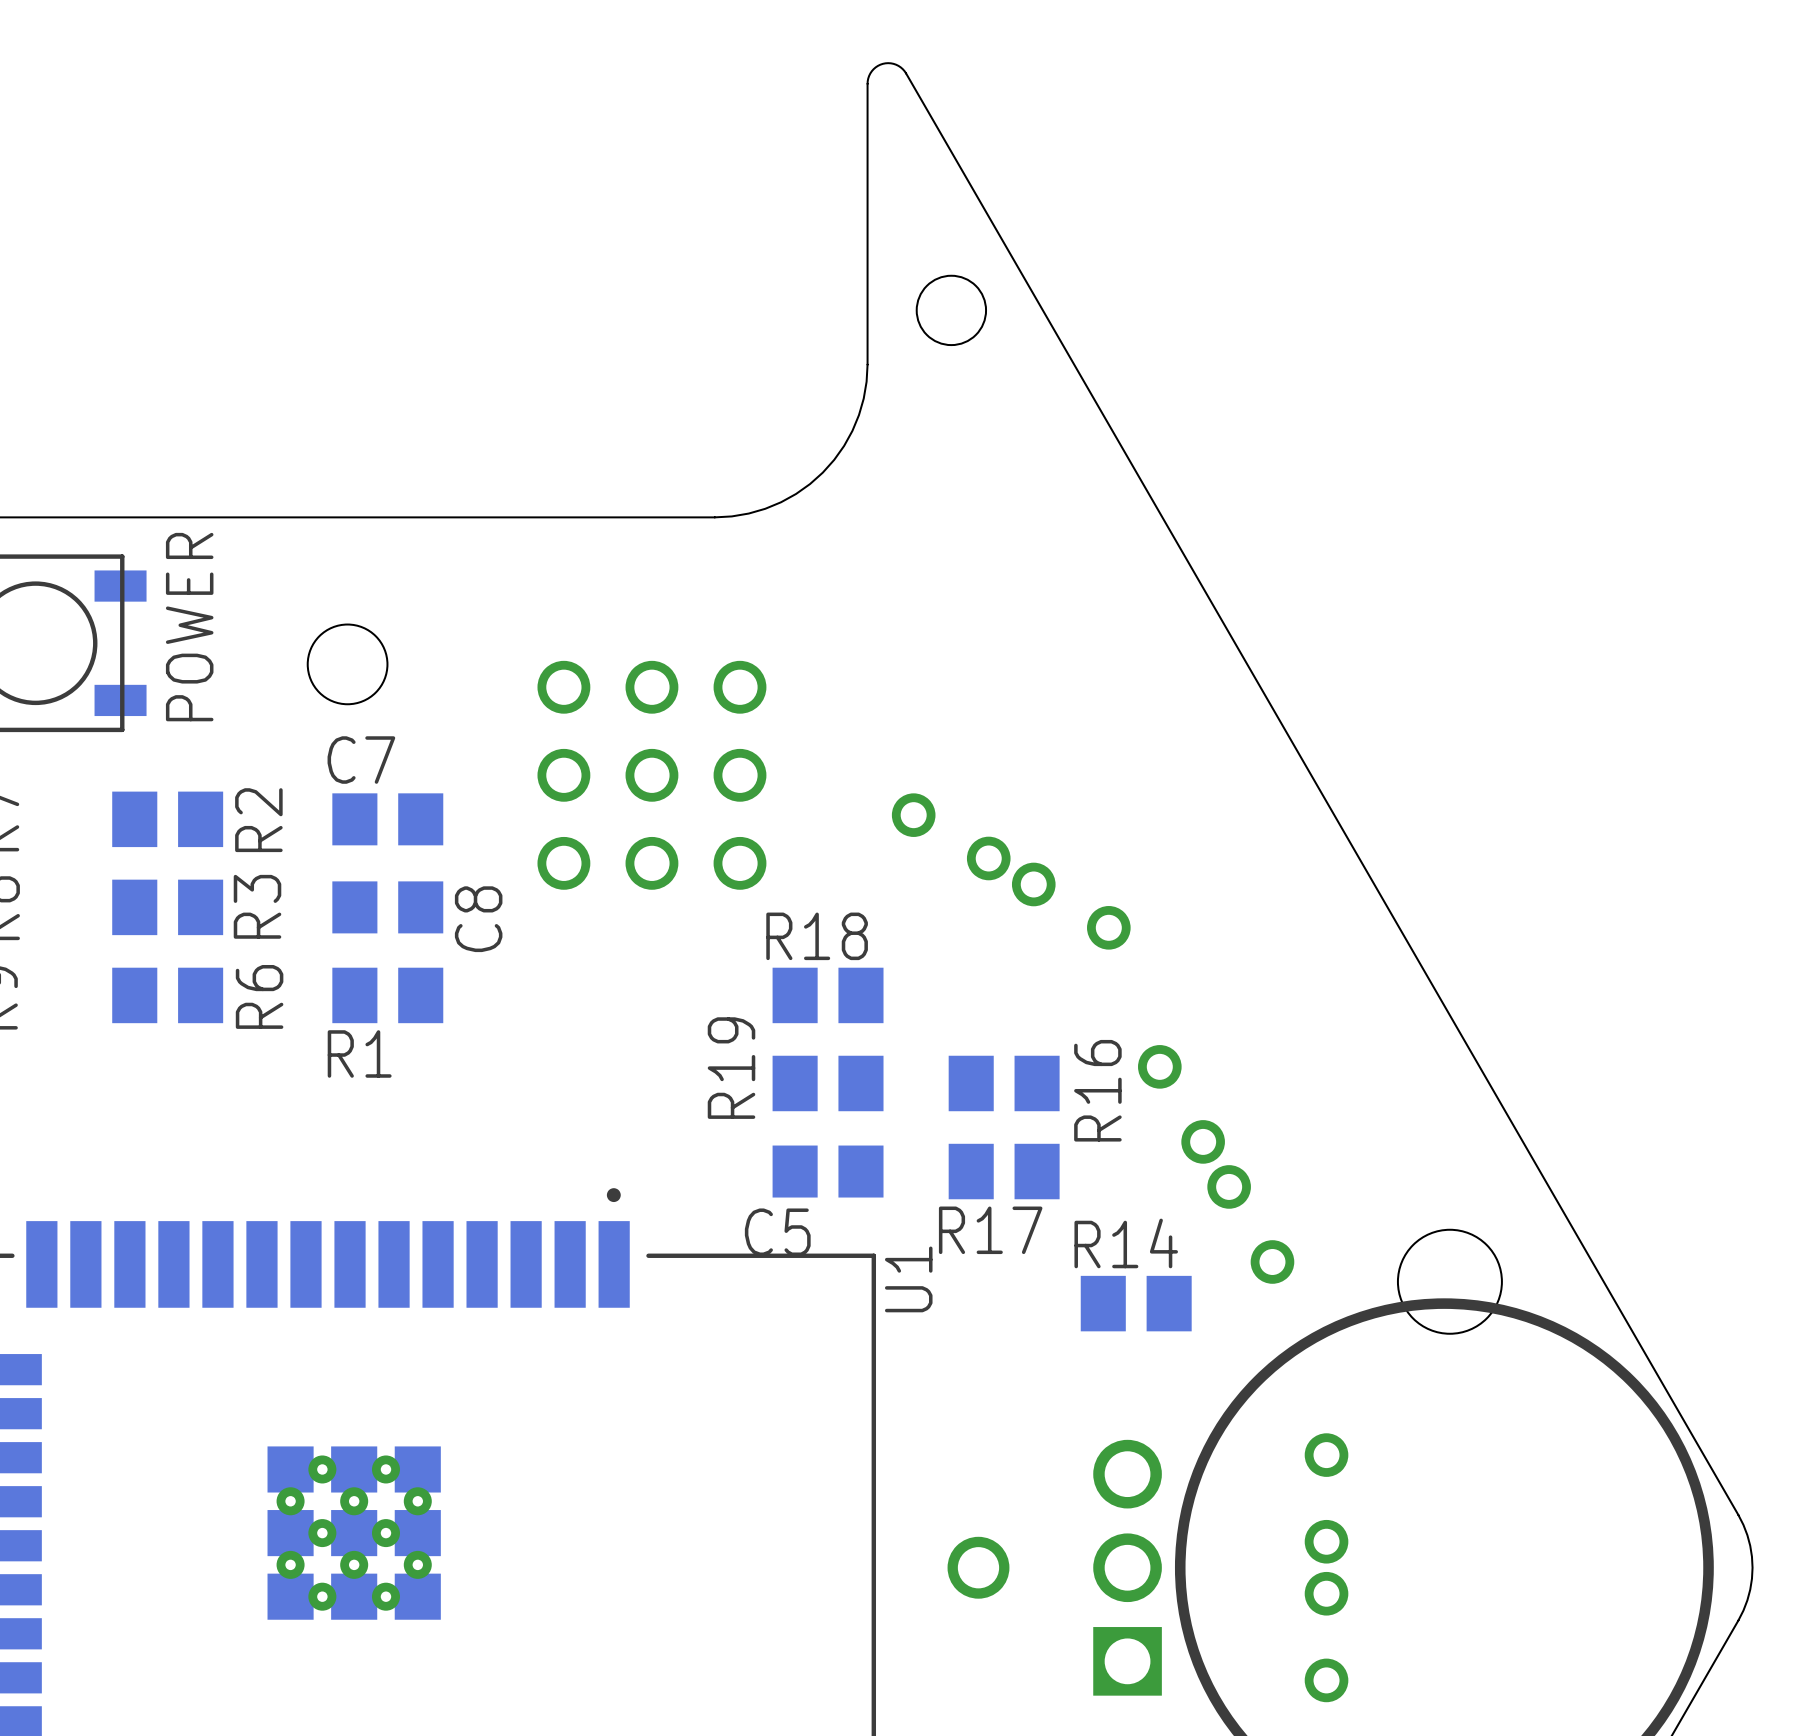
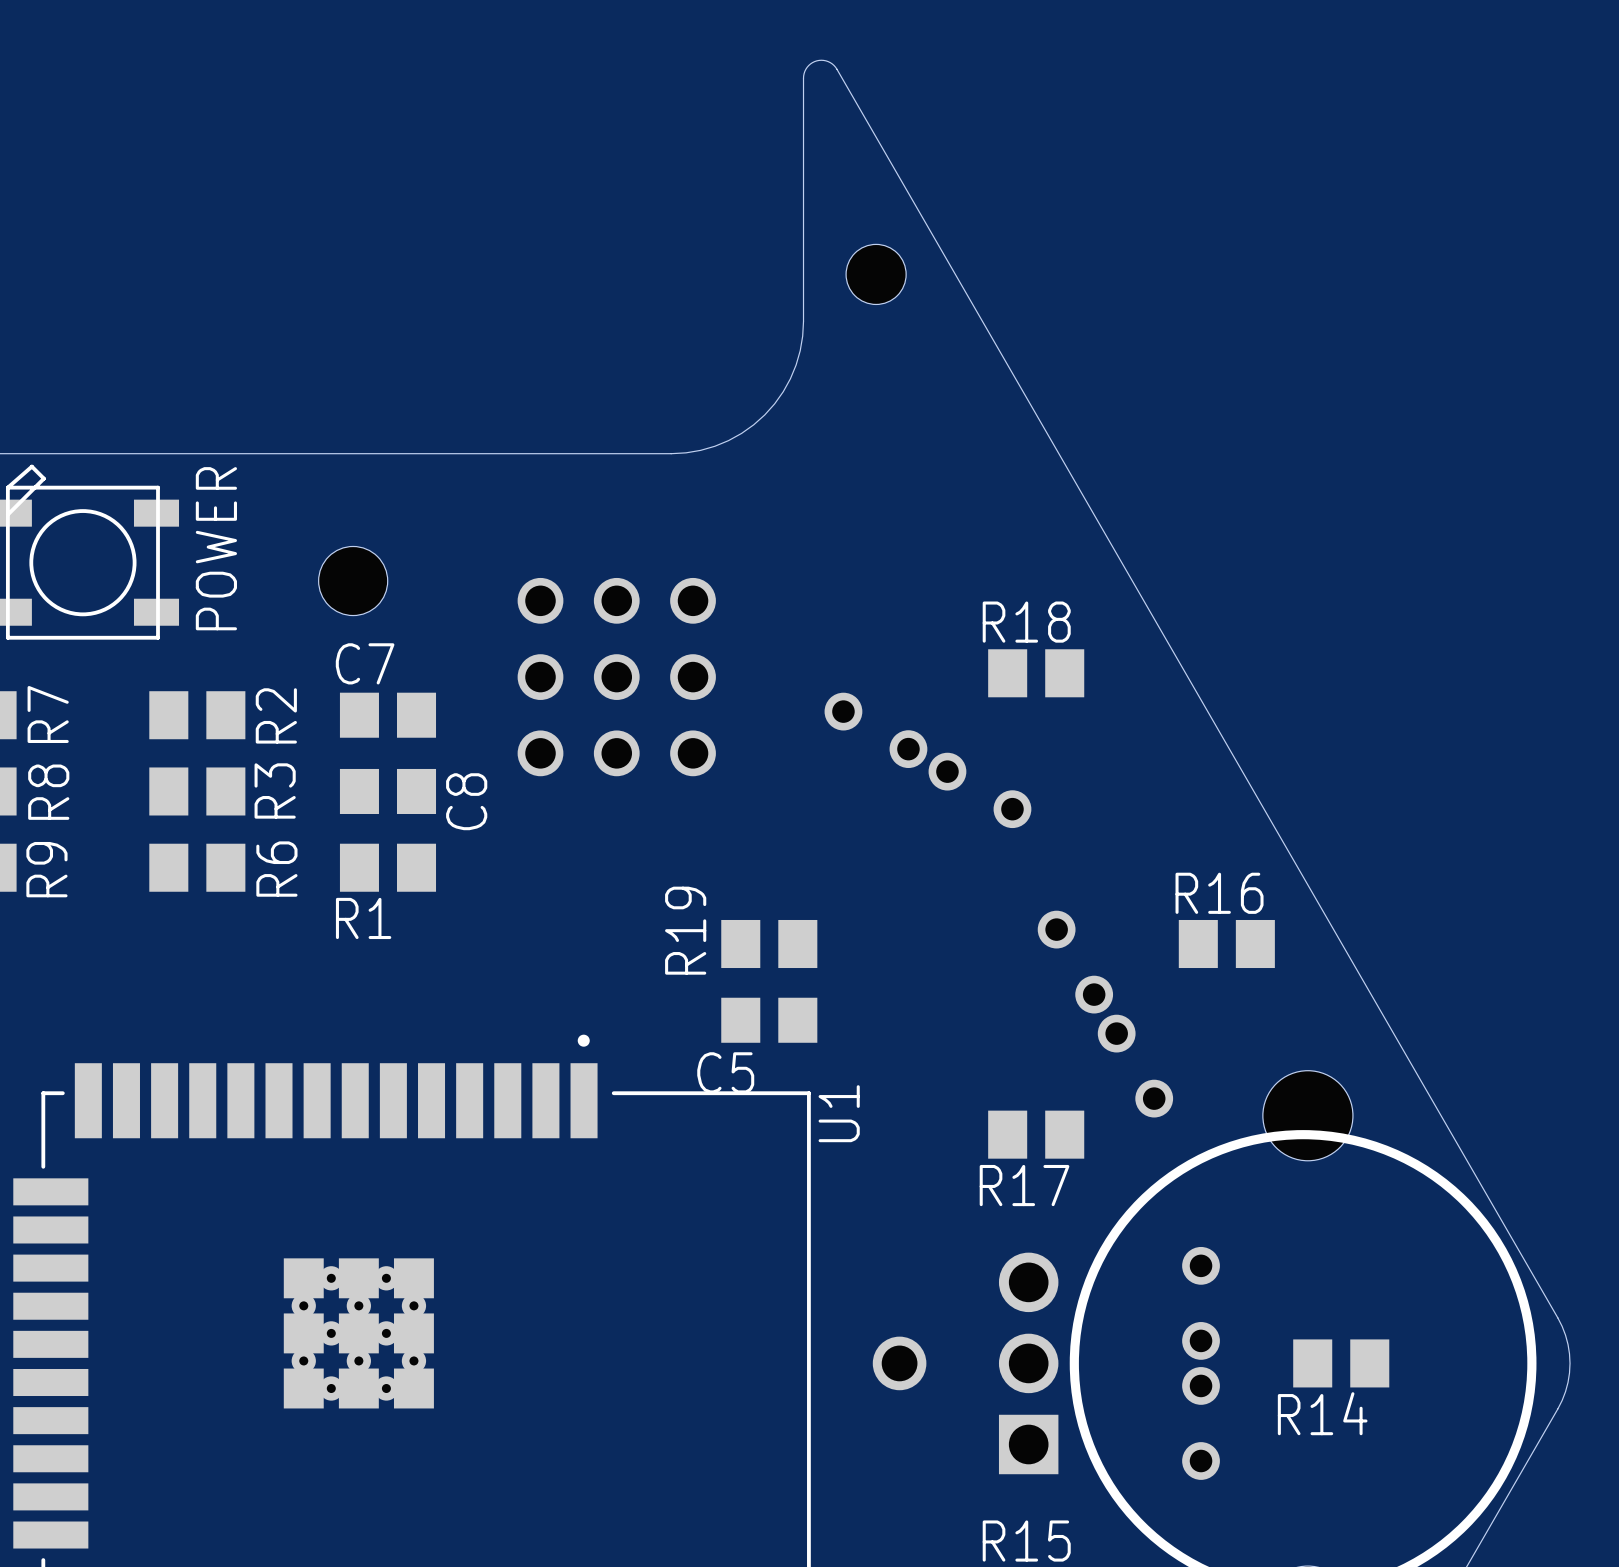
R18 position: (828, 995) -> (1036, 673)
R16 position: (1004, 1083) -> (1226, 944)
R16 name rotation: 0° (1097, 1090) -> 90° clockwise (1219, 893)
R17: (1004, 1171) -> none
R14 name: R14 (1126, 1243) -> R17 (1024, 1185)
R14: none -> (1341, 1363)

